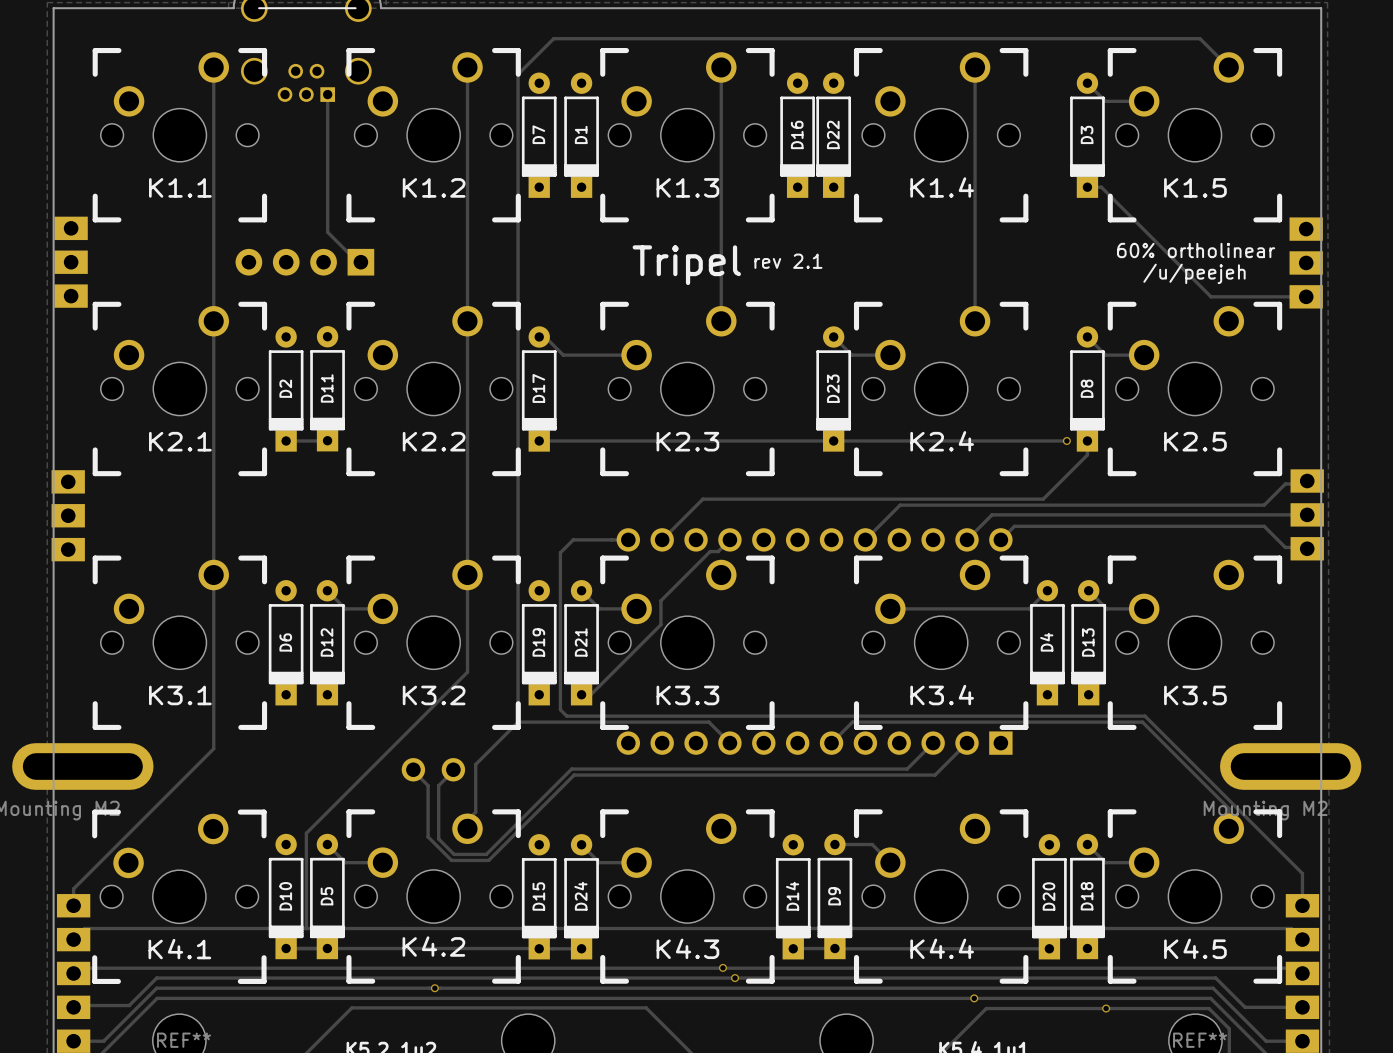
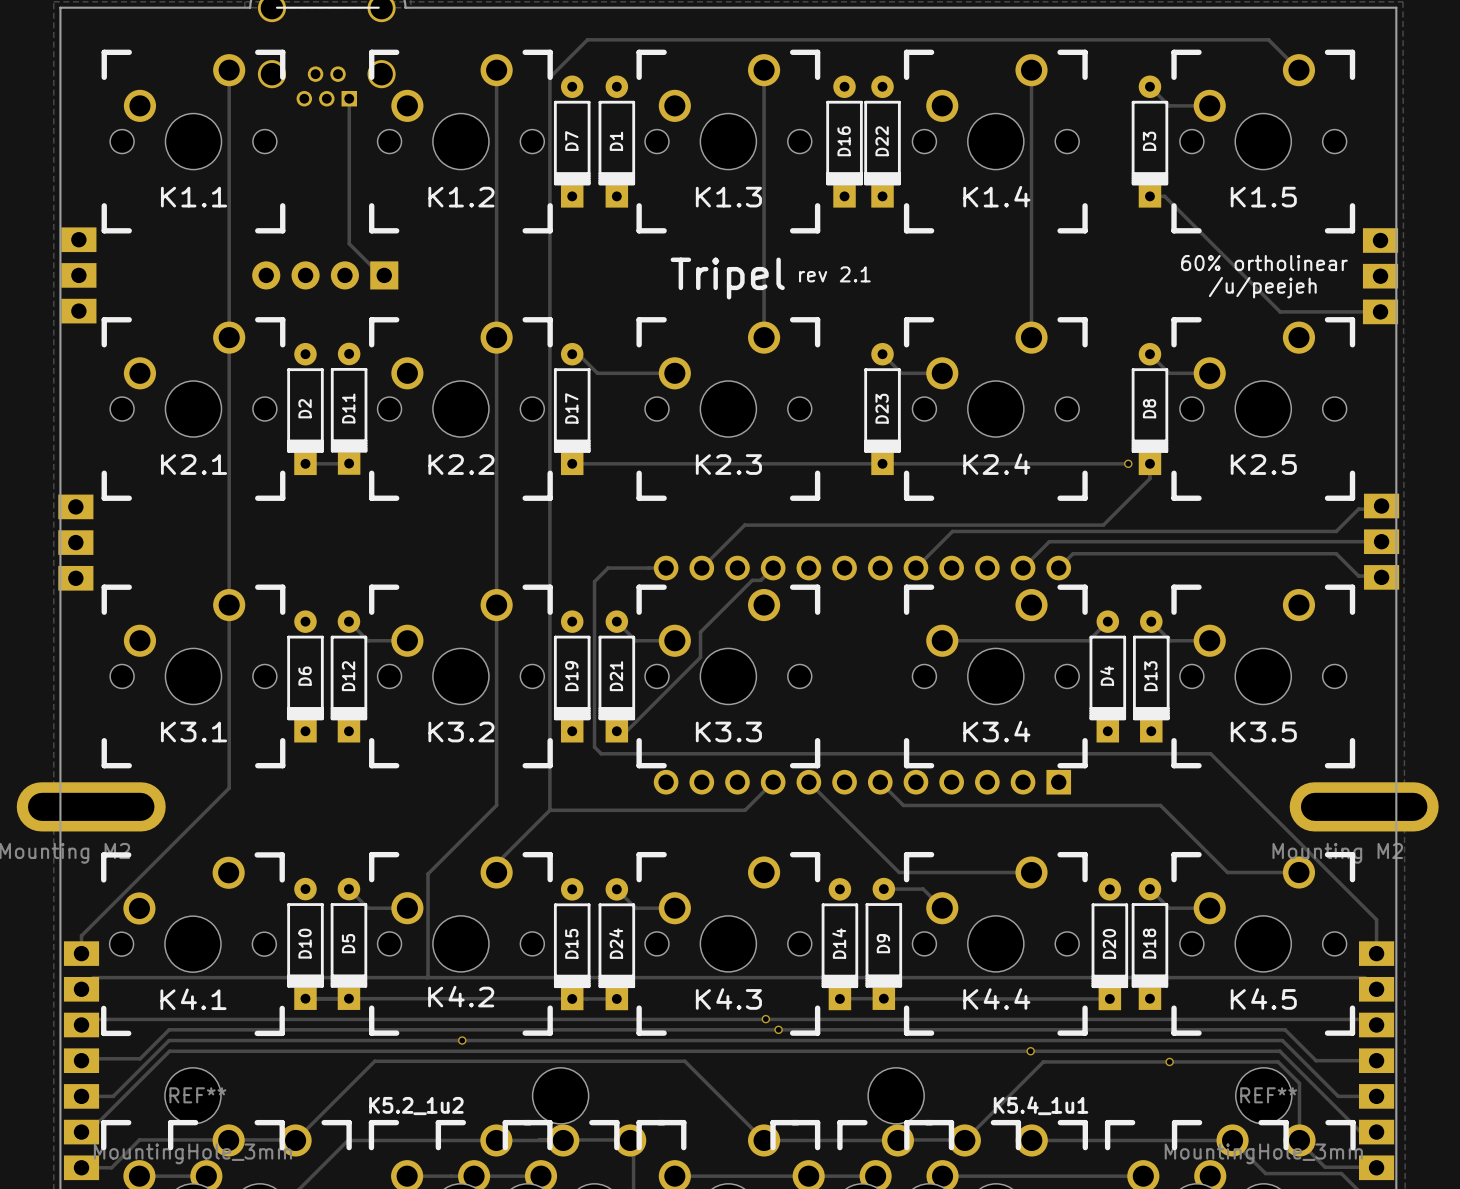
track: (467, 672) (306, 833) (306, 928) -> (496, 707) (496, 805) (428, 873) (427, 977)
track: none -> (549, 760) (549, 810)
track: (729, 743) (708, 722) (518, 722) (475, 764) (475, 812) -> (773, 782) (745, 810) (549, 810)
track: none -> (808, 782) (899, 872) (1031, 872)
track: (831, 743) (852, 722) (1142, 722) (1228, 808) (1228, 828) -> (880, 782) (903, 805) (1160, 805) (1227, 872) (1298, 872)
track: (933, 743) (907, 769) (571, 769) (486, 854) (454, 854) (438, 839) (438, 785) (453, 769) -> none
track: (967, 743) (935, 775) (574, 775) (488, 860) (451, 860) (428, 836) (428, 785) (413, 769) -> none
part: (433, 769) -> none
track: none -> (549, 810) (505, 854)

